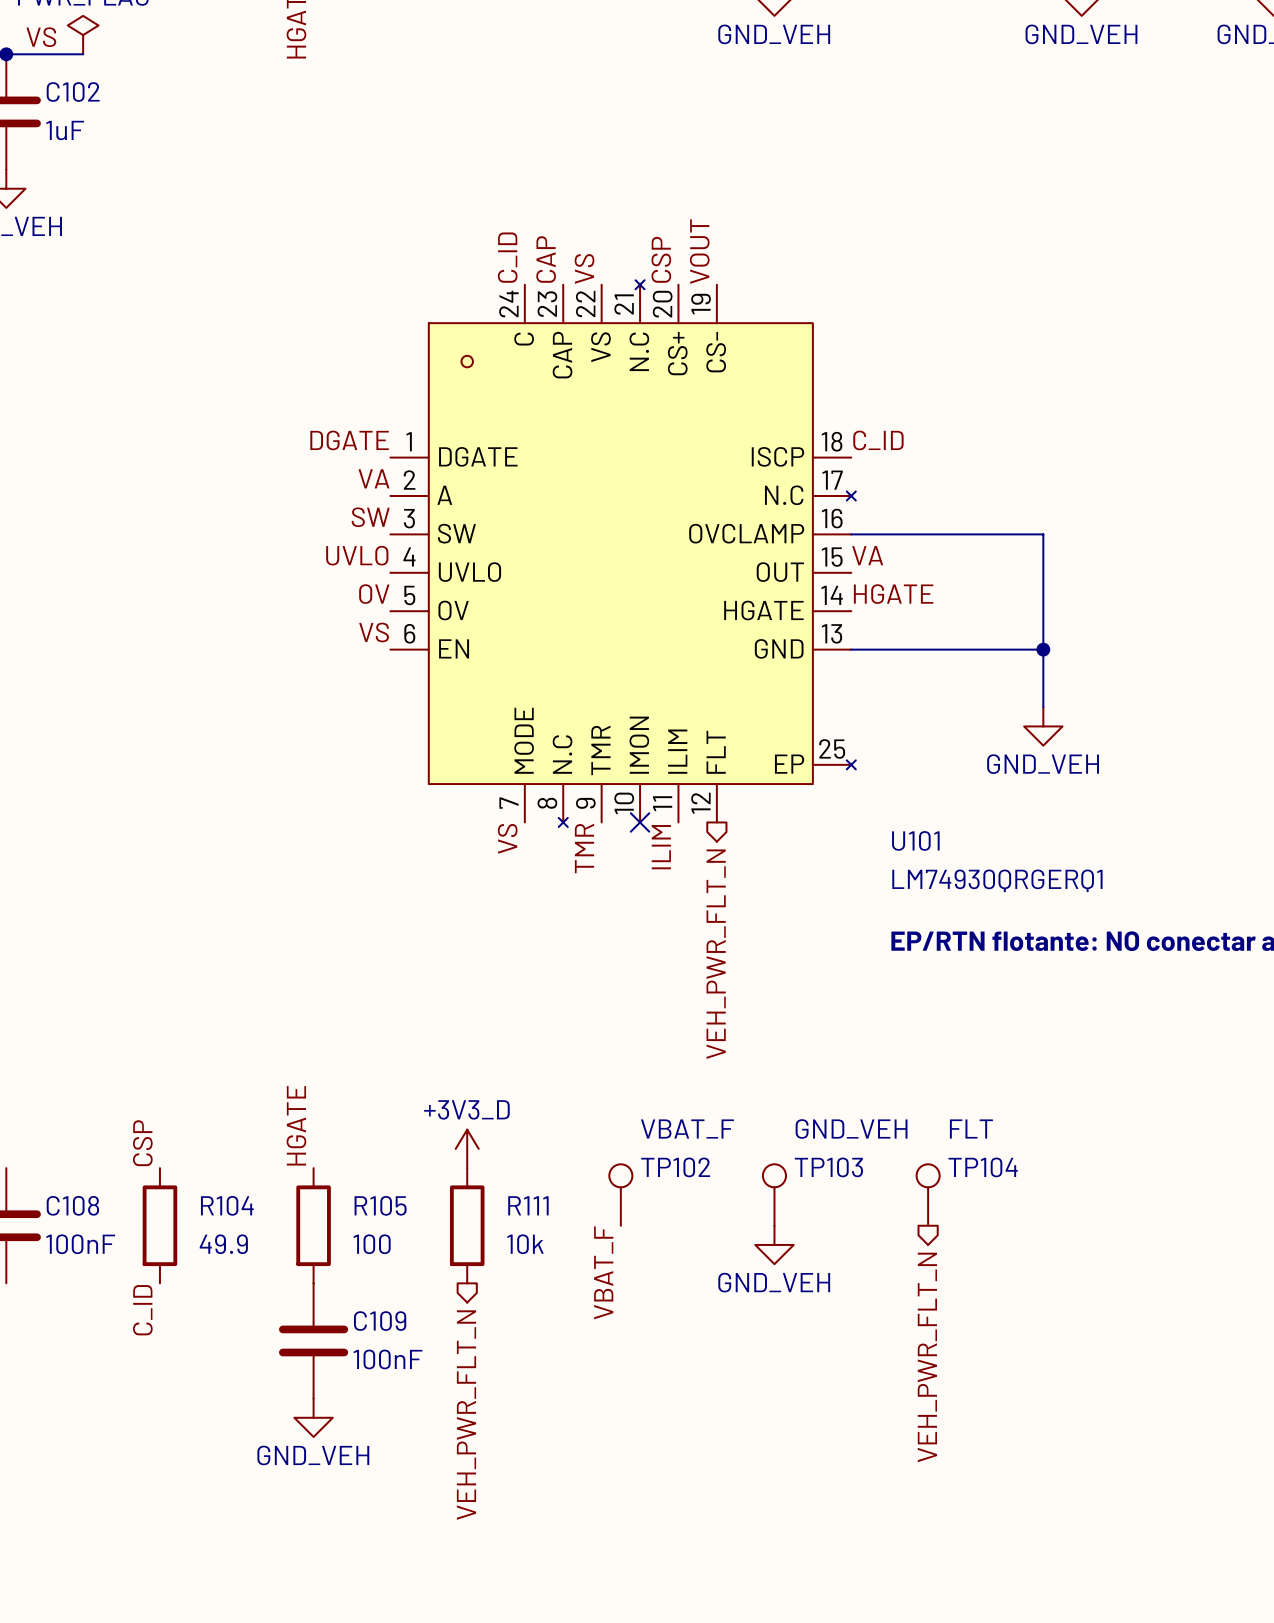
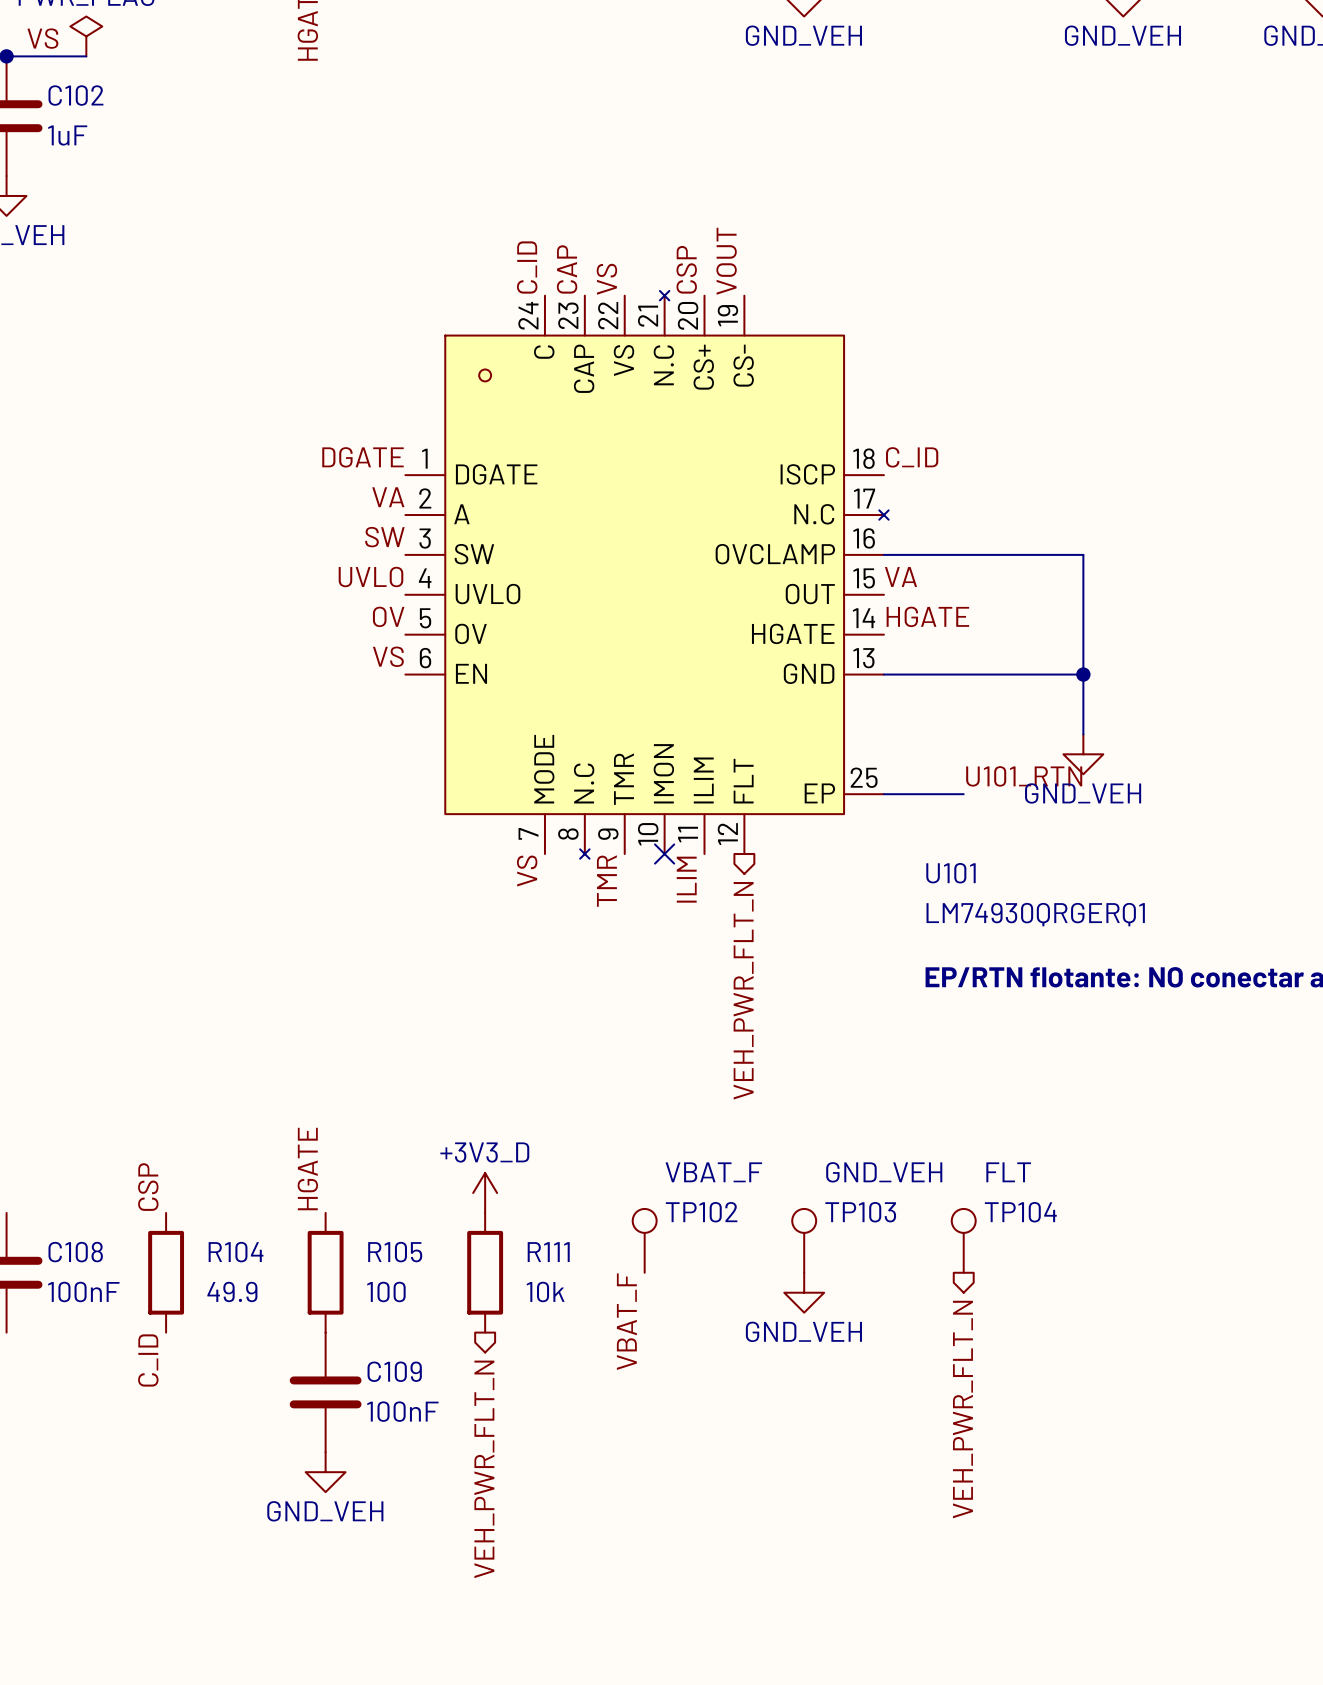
U101 symbol: [390, 280, 856, 827] -> [405, 290, 889, 859]
label: none -> U101_RTN (1024, 776)
wire: none -> (883, 794) (963, 794)

